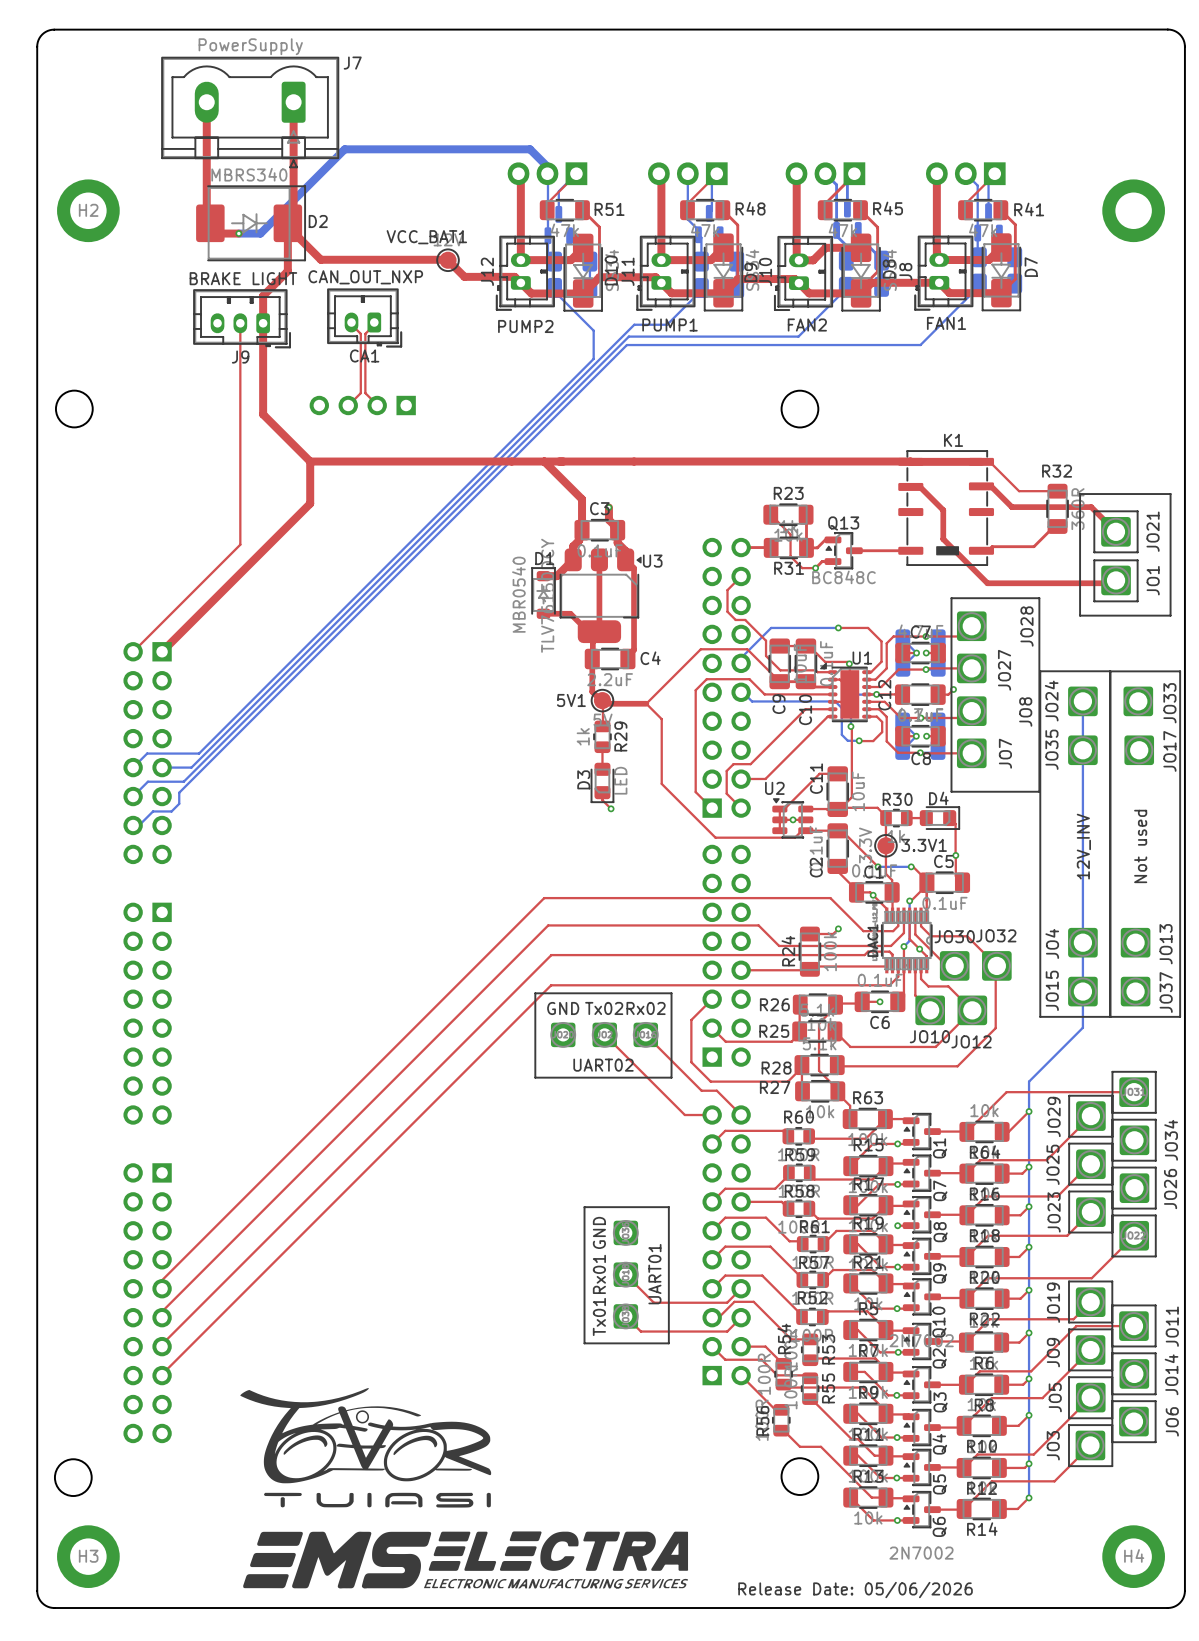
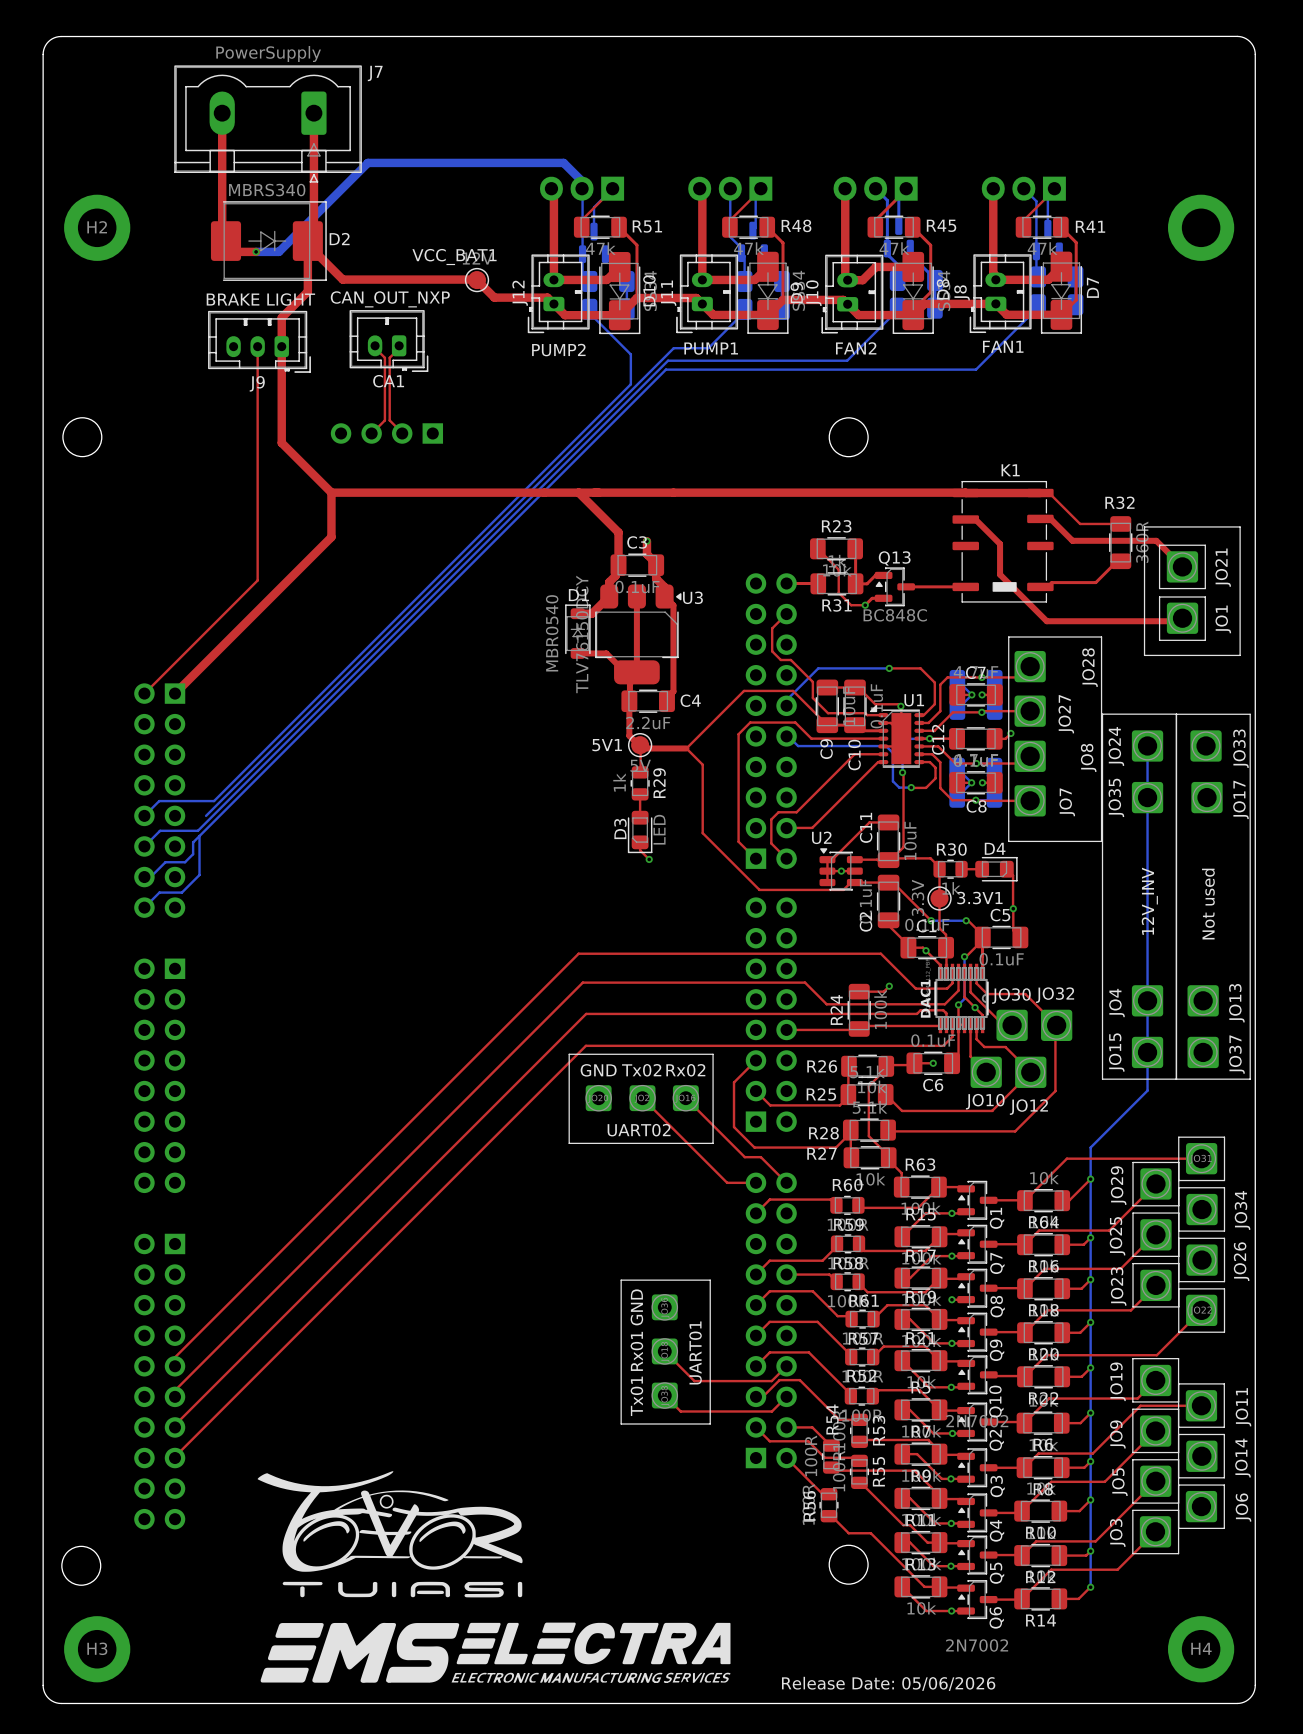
bottom track: (162, 767) (191, 767) -> none
bottom track: none -> (199, 836) (199, 875) (181, 892) (159, 892) (144, 907)

